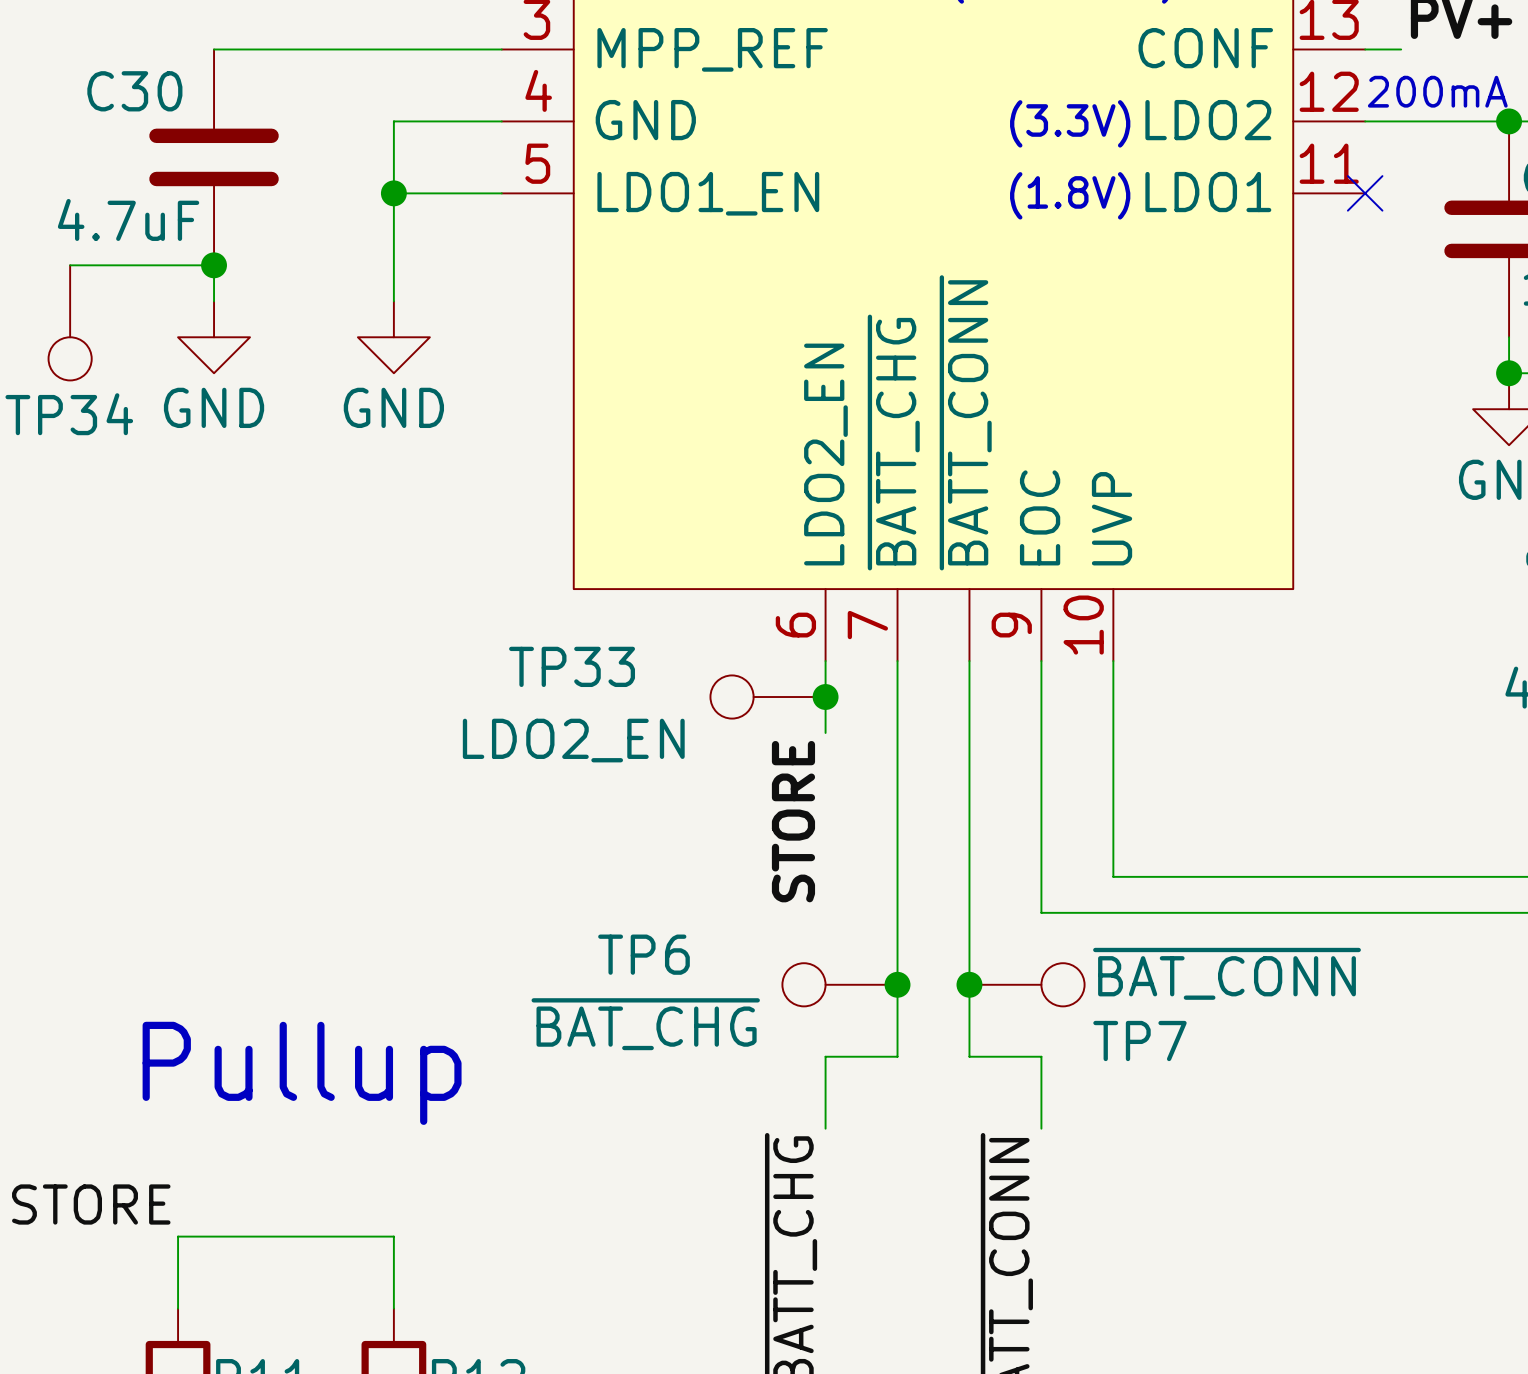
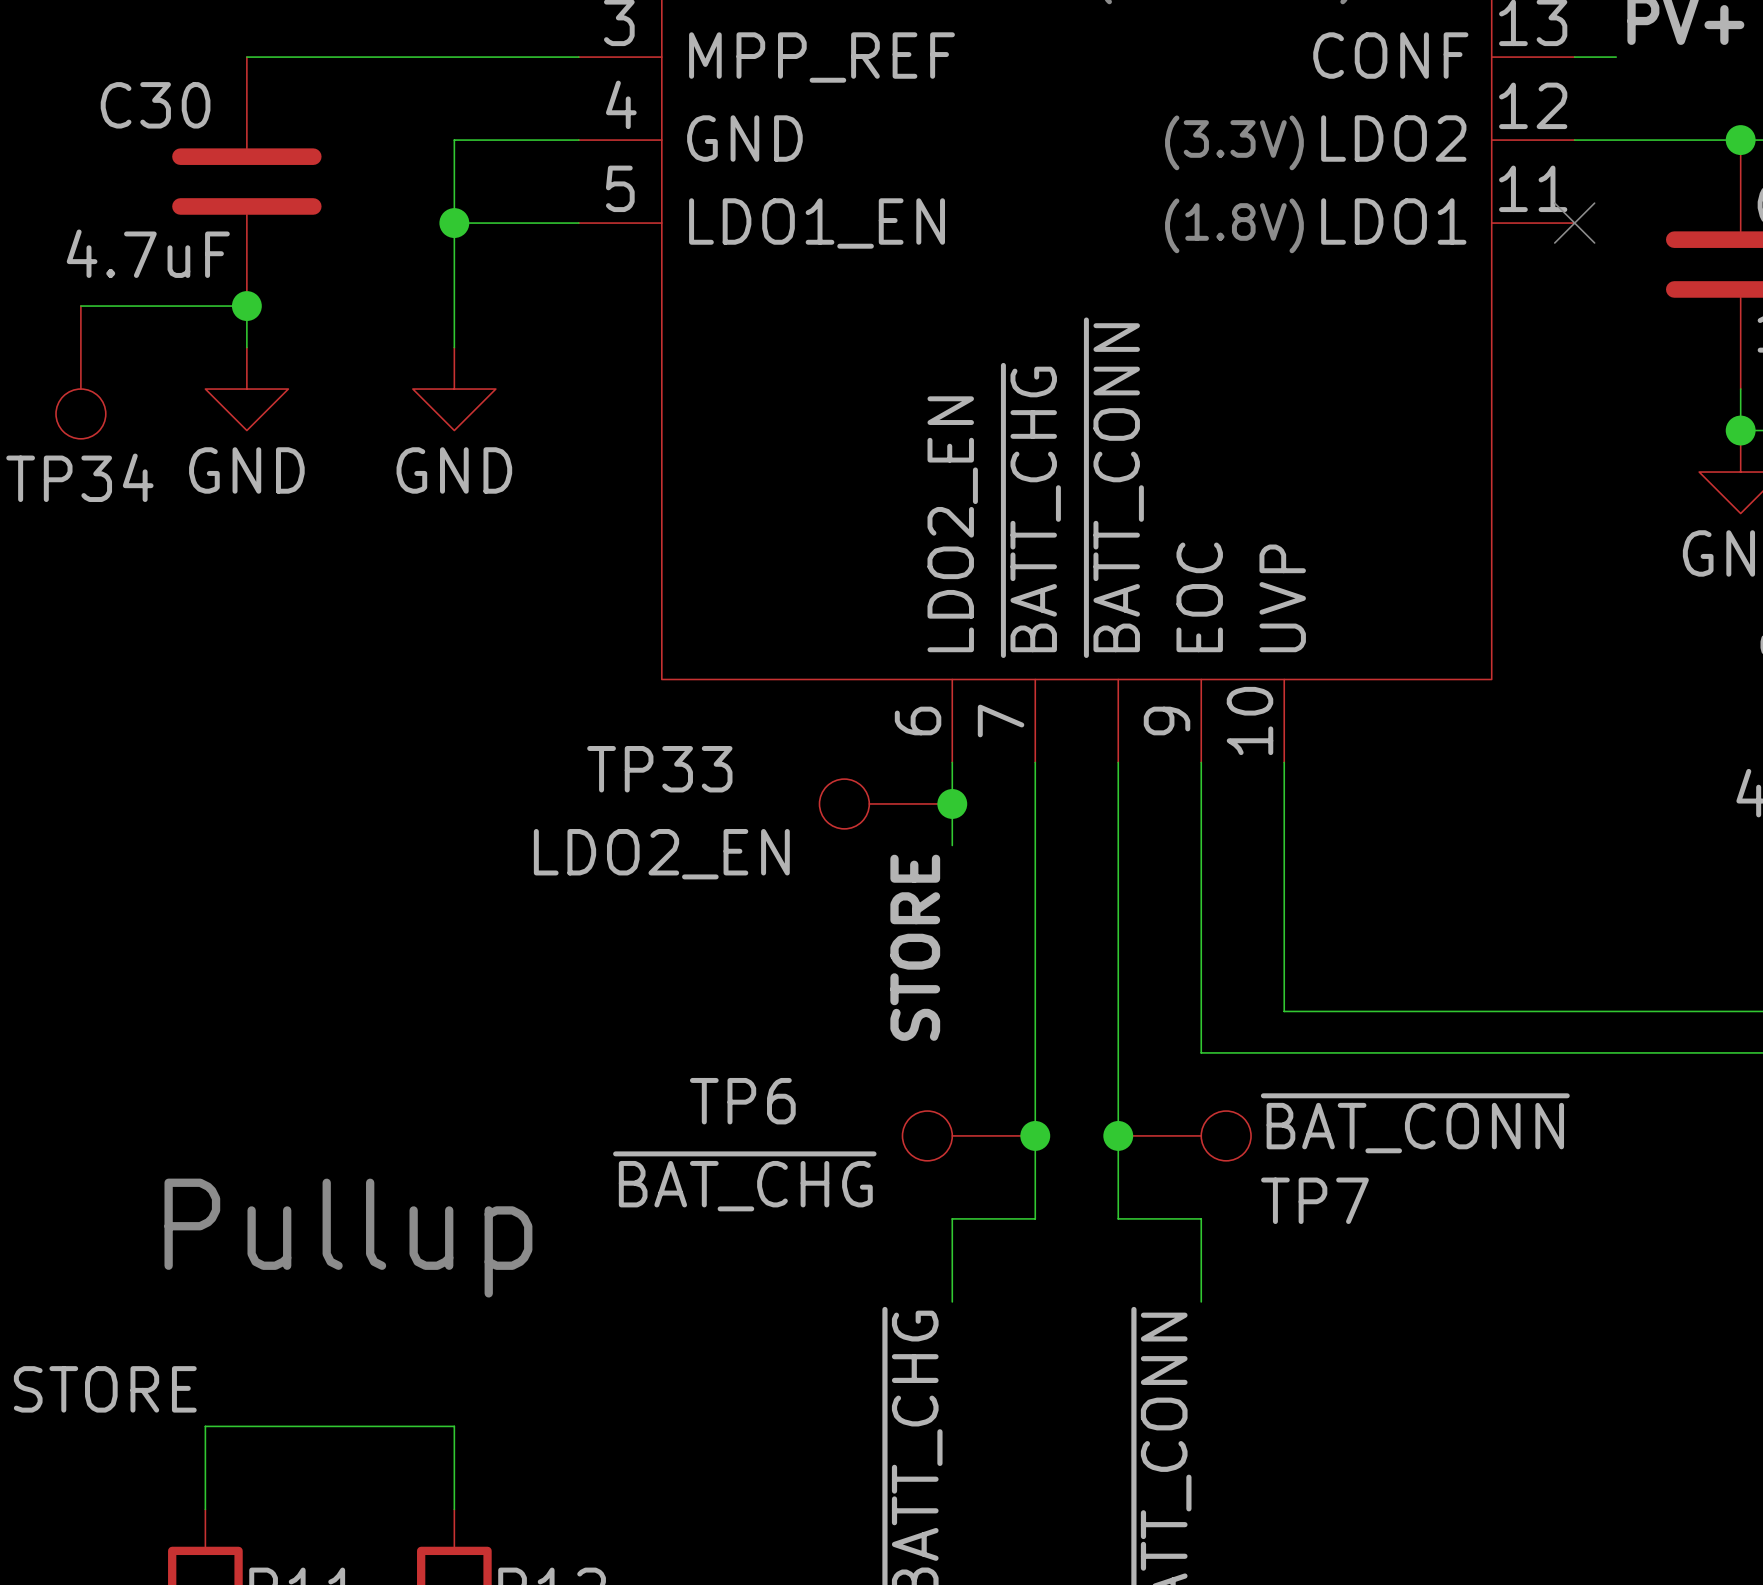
text: 200mA (1437, 91) -> none

